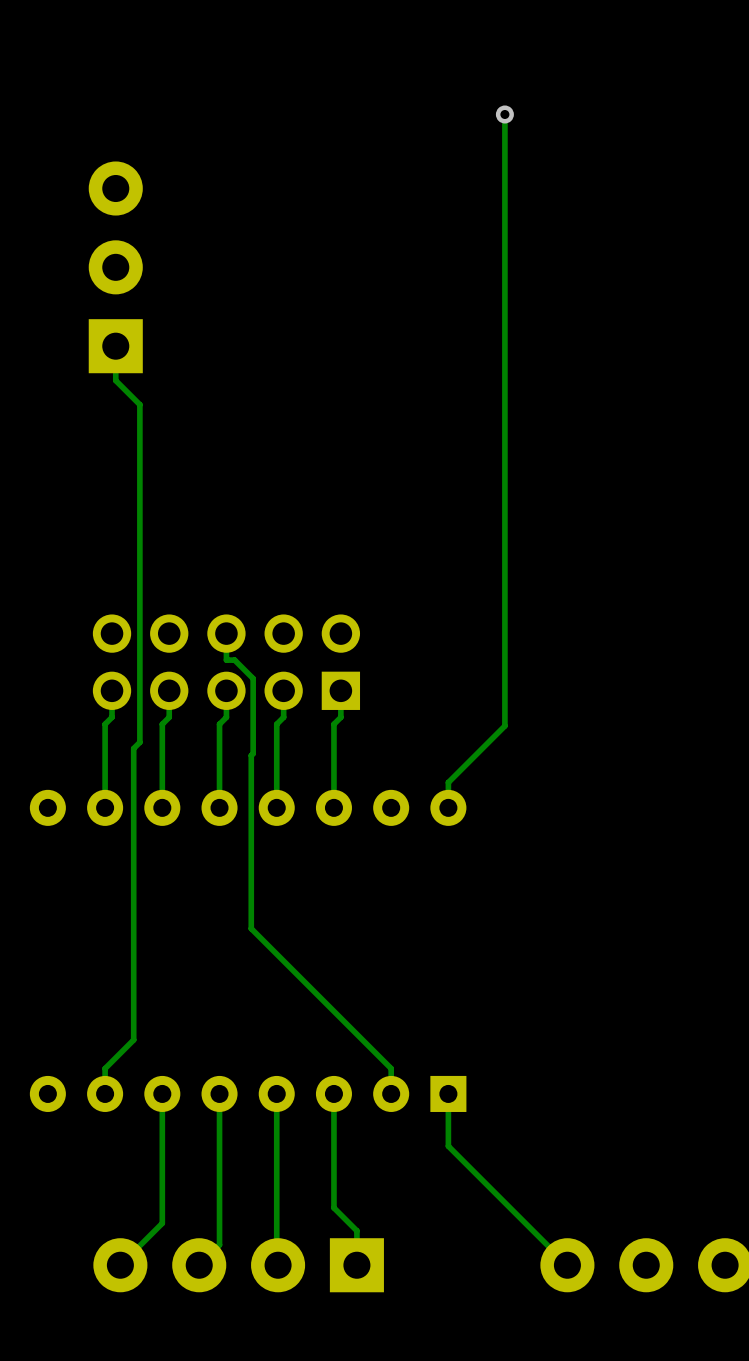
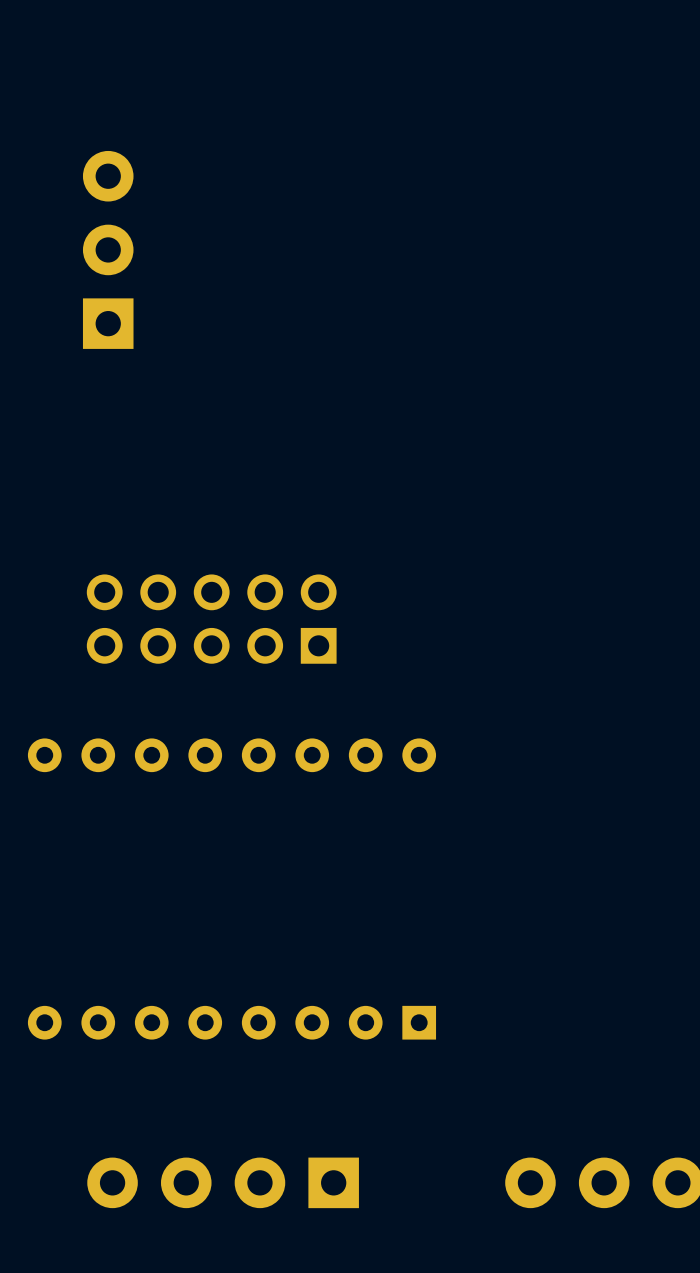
track: (504, 114) (504, 725) (448, 782) (448, 807) -> none
via: (504, 114) -> none
track: (115, 346) (115, 380) (139, 404) (139, 742) (133, 748) (133, 1039) (105, 1068) (105, 1093) -> none
track: (226, 633) (226, 660) (234, 660) (253, 678) (251, 928) (391, 1068) (391, 1093) -> none
track: (112, 690) (112, 717) (105, 724) (105, 807) -> none
track: (169, 690) (169, 717) (162, 724) (162, 807) -> none
track: (226, 690) (226, 717) (219, 724) (219, 807) -> none
track: (283, 690) (283, 717) (276, 724) (276, 807) -> none
track: (340, 690) (340, 717) (333, 724) (333, 807) -> none
track: (162, 1093) (162, 1223) (120, 1265) -> none
track: (219, 1093) (219, 1244) (199, 1265) -> none
track: (276, 1093) (278, 1265) -> none
track: (333, 1093) (333, 1207) (356, 1230) (356, 1265) -> none
track: (448, 1093) (448, 1146) (567, 1265) -> none

